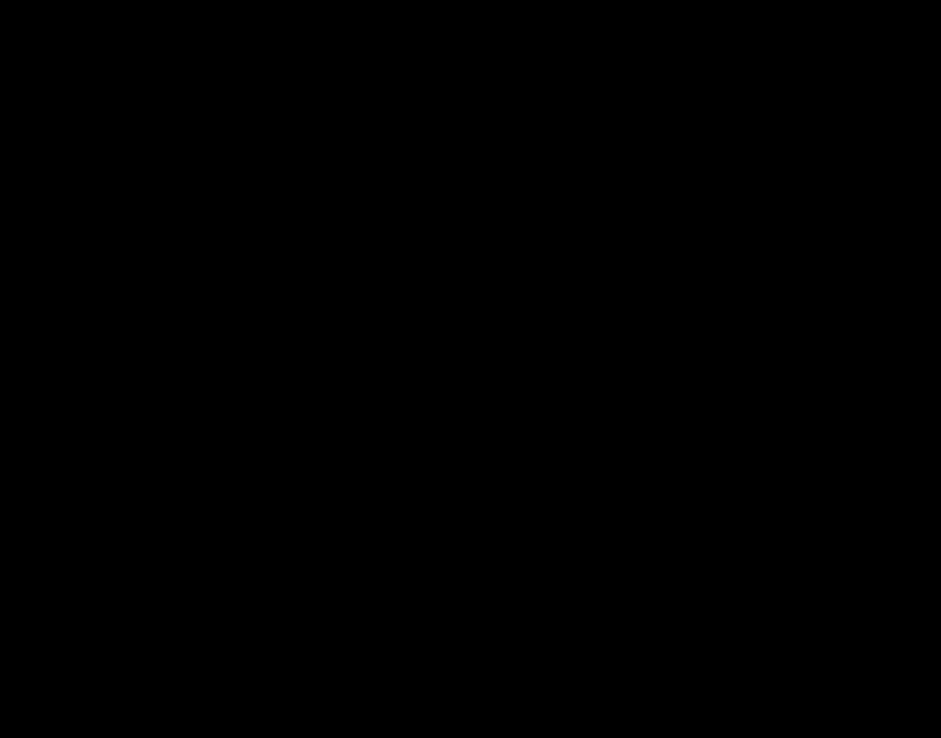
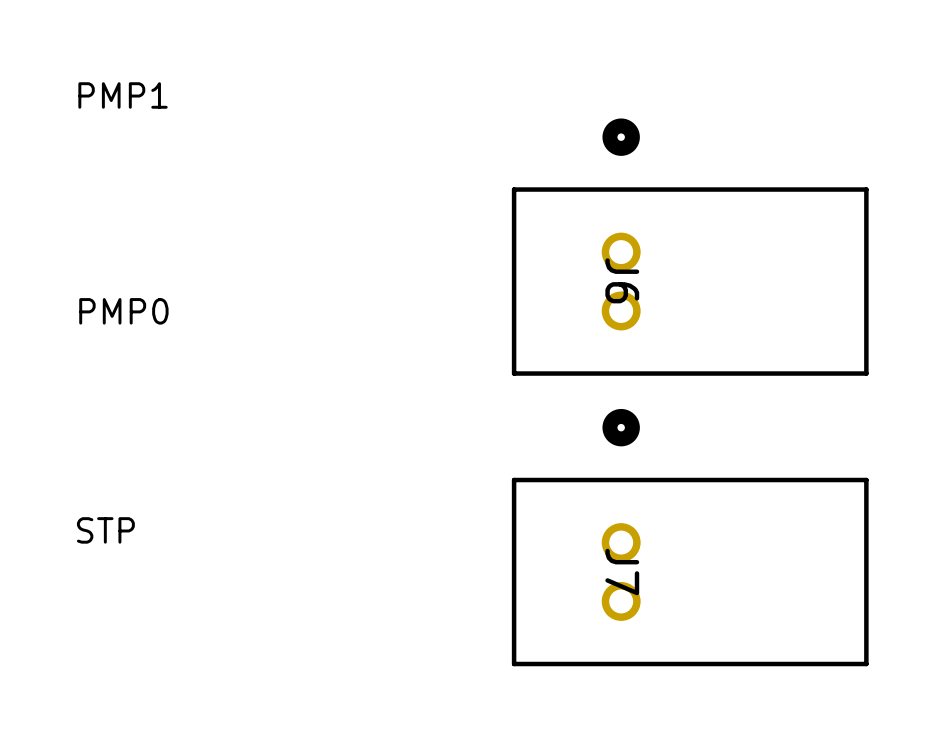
text: none -> PMP1 (123, 95)
J6: none -> (690, 247)
text: none -> PMP0 (123, 311)
text: none -> STP (105, 530)
J7: none -> (690, 537)

